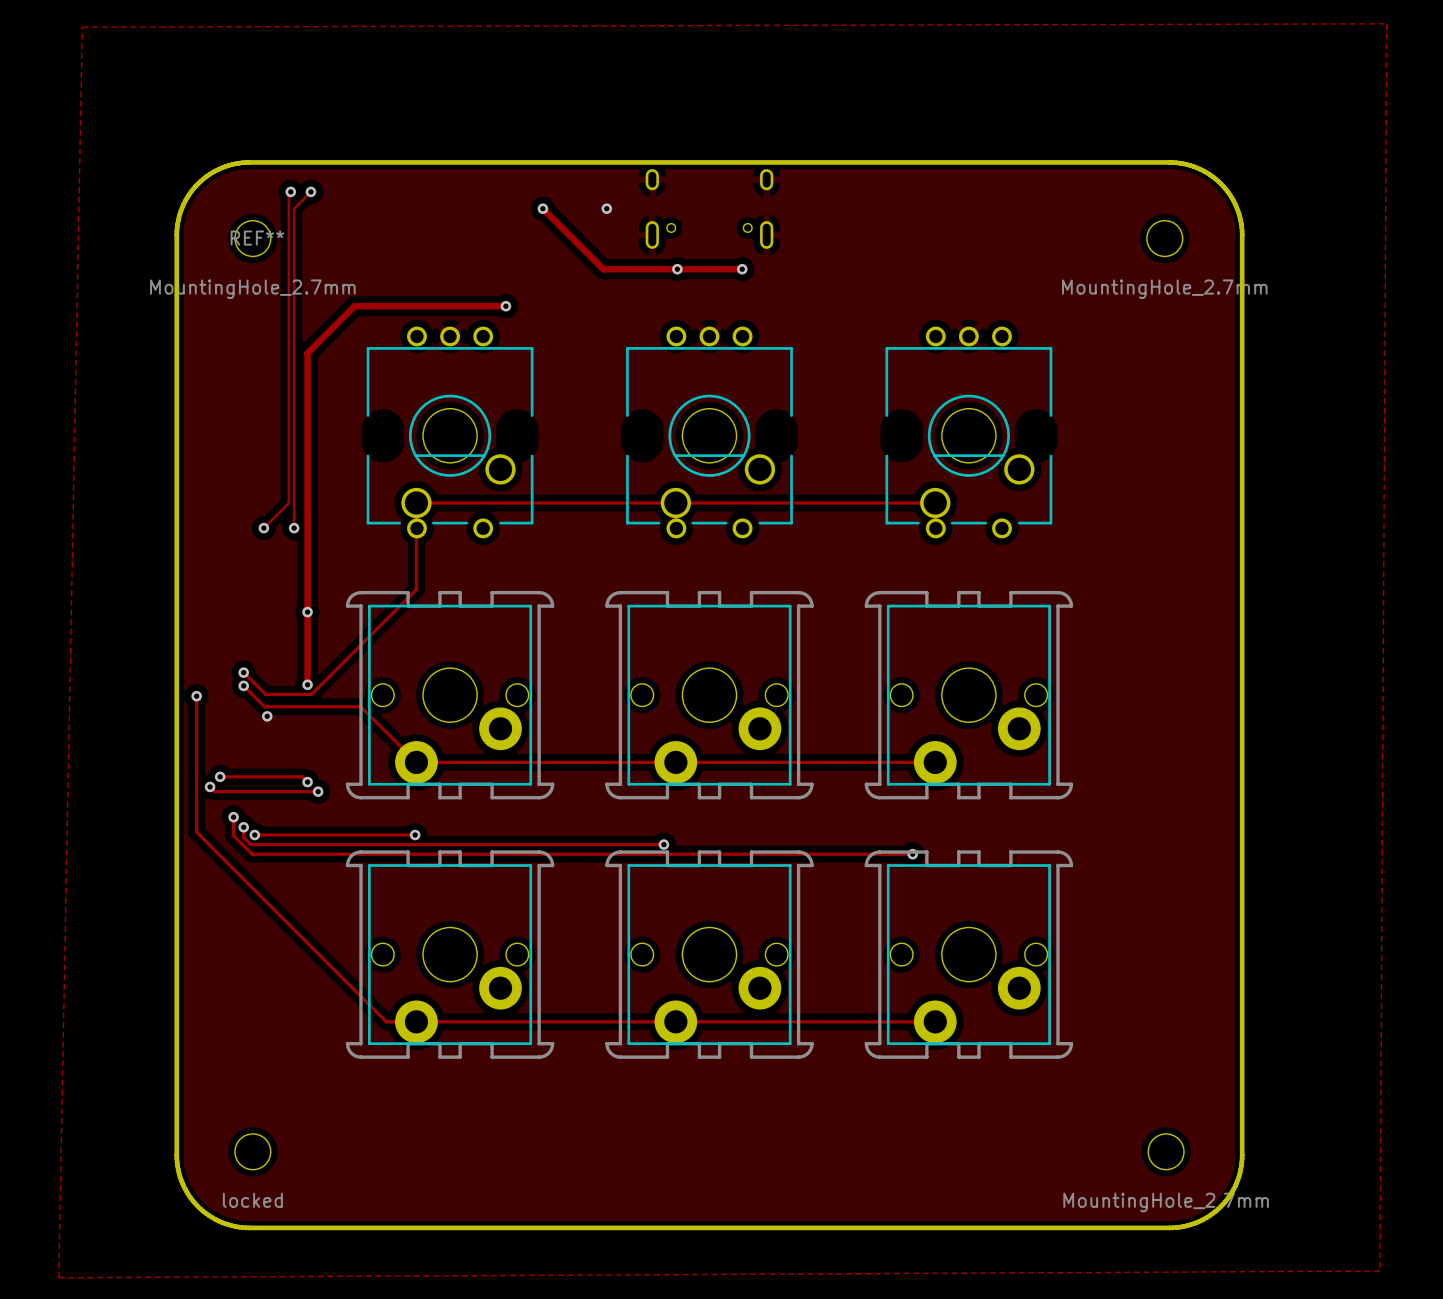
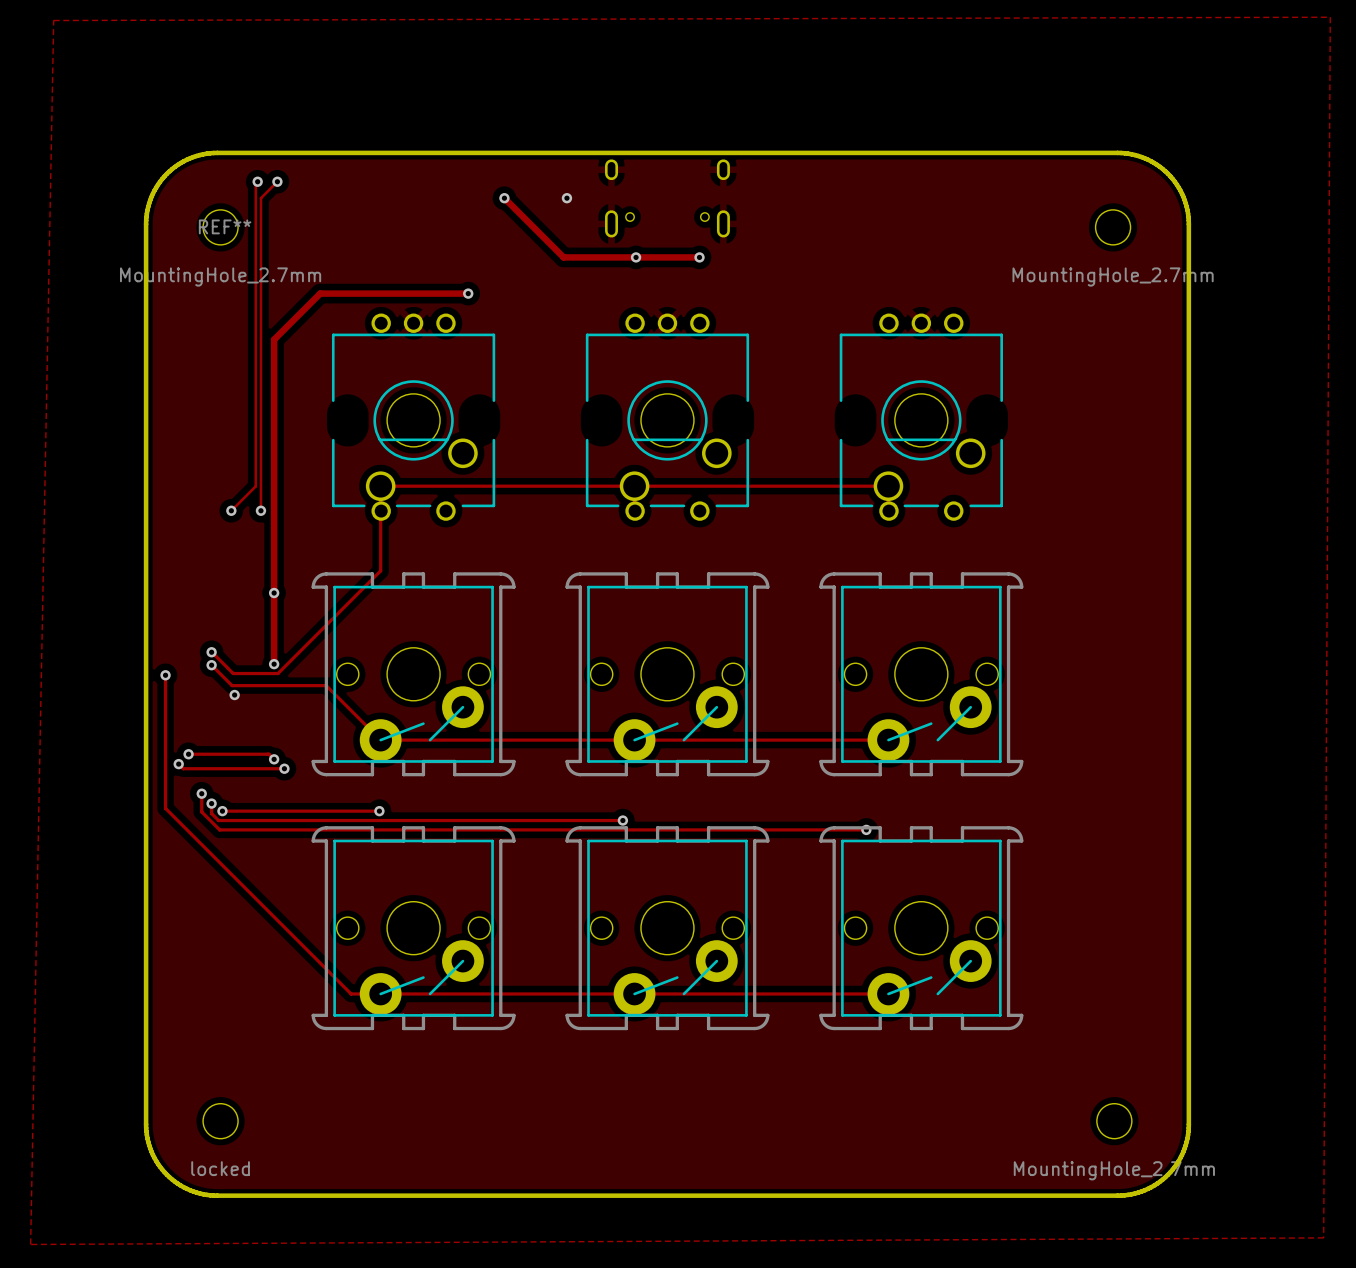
part footprint: [345, 590, 555, 800] -> [311, 572, 516, 777]
part footprint: [605, 590, 814, 800] -> [565, 572, 770, 777]
part footprint: [864, 590, 1074, 800] -> [819, 572, 1024, 777]
part footprint: [345, 850, 555, 1059] -> [311, 826, 516, 1031]
part footprint: [605, 850, 814, 1059] -> [565, 826, 770, 1031]
part footprint: [864, 850, 1074, 1059] -> [819, 826, 1024, 1031]

